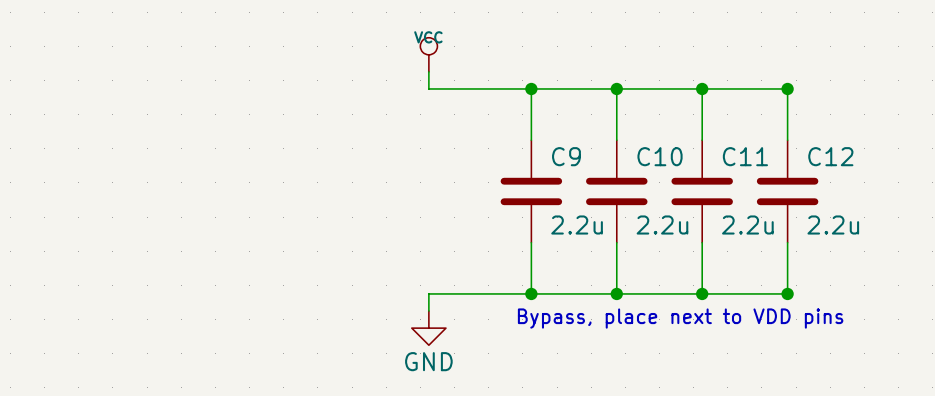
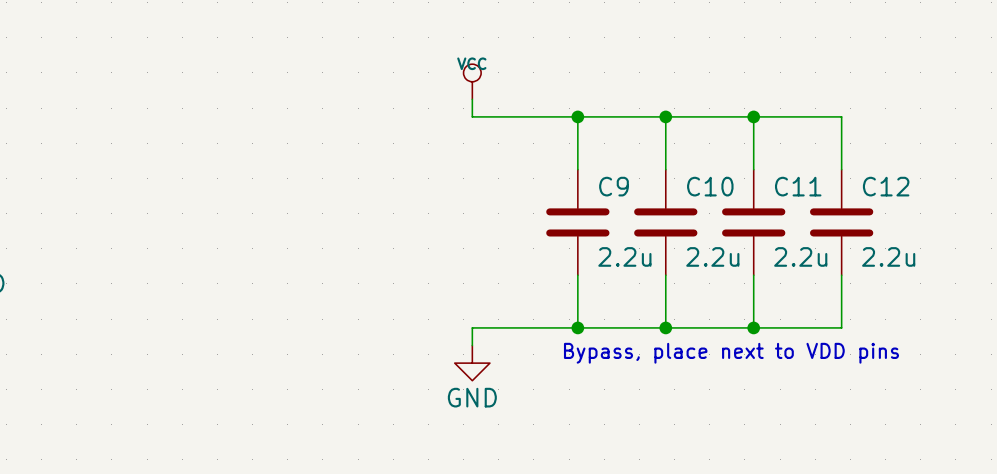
junction: (787, 88) -> none
junction: (787, 293) -> none

